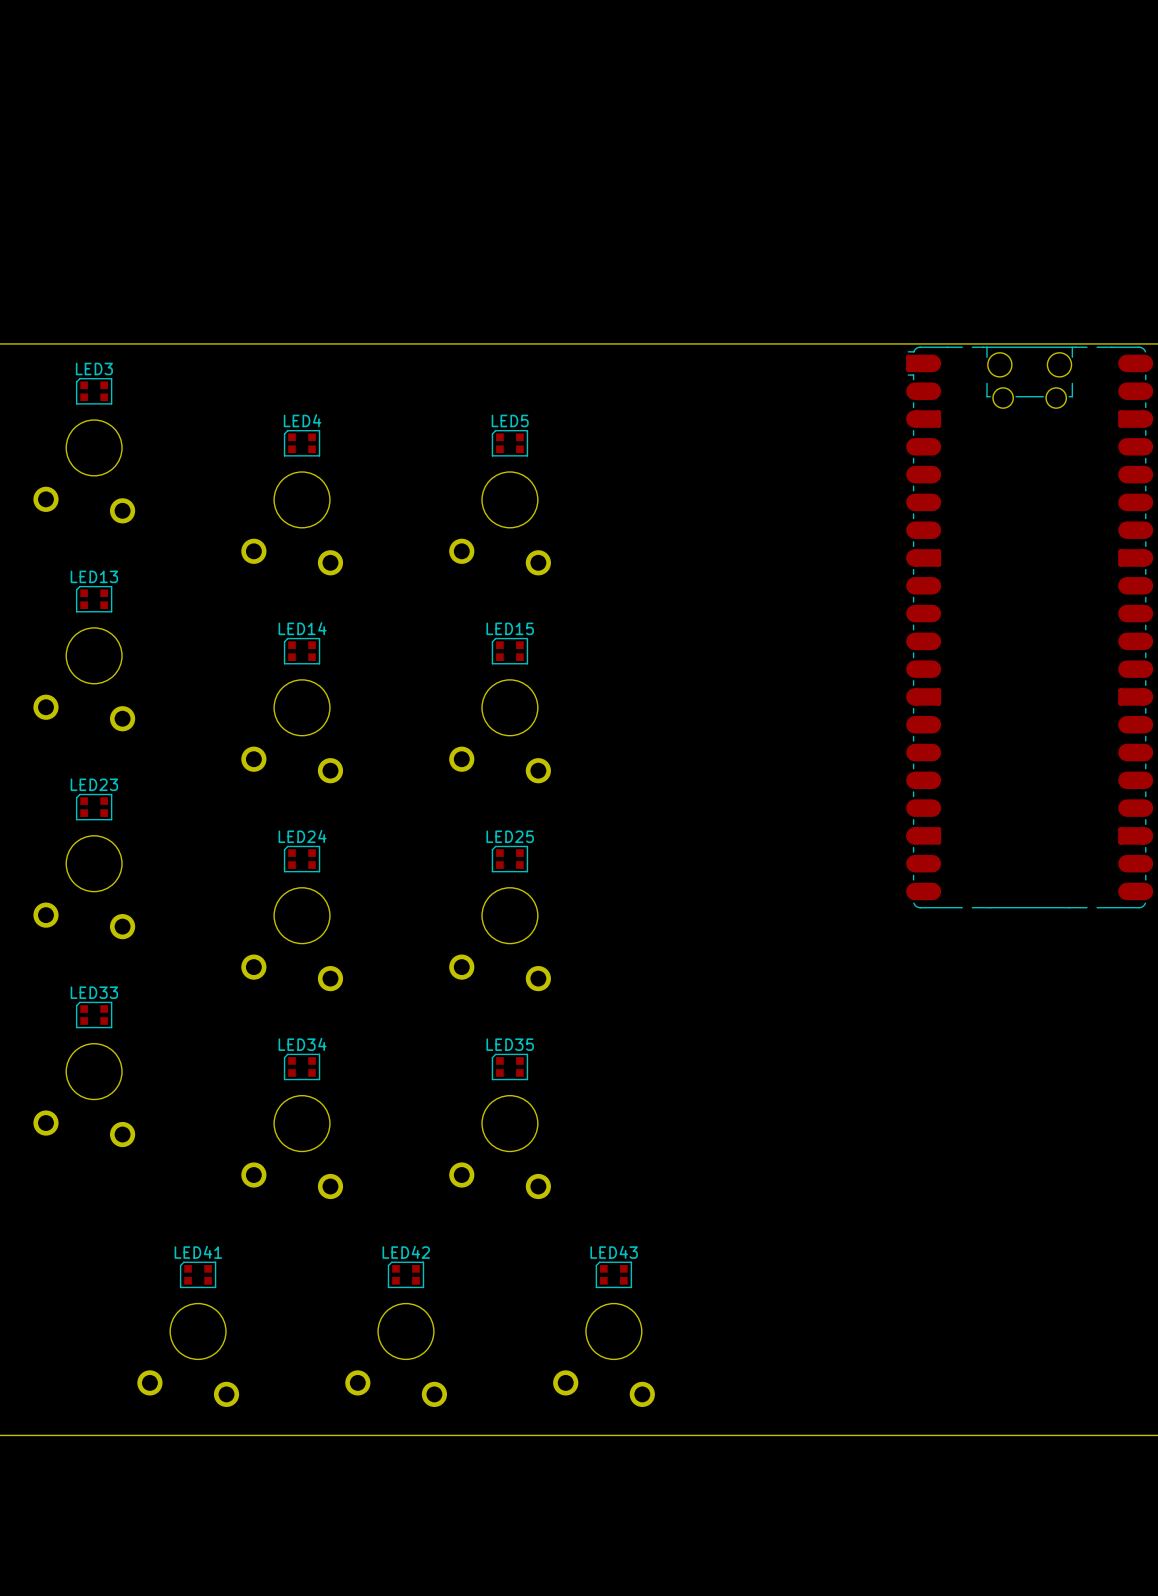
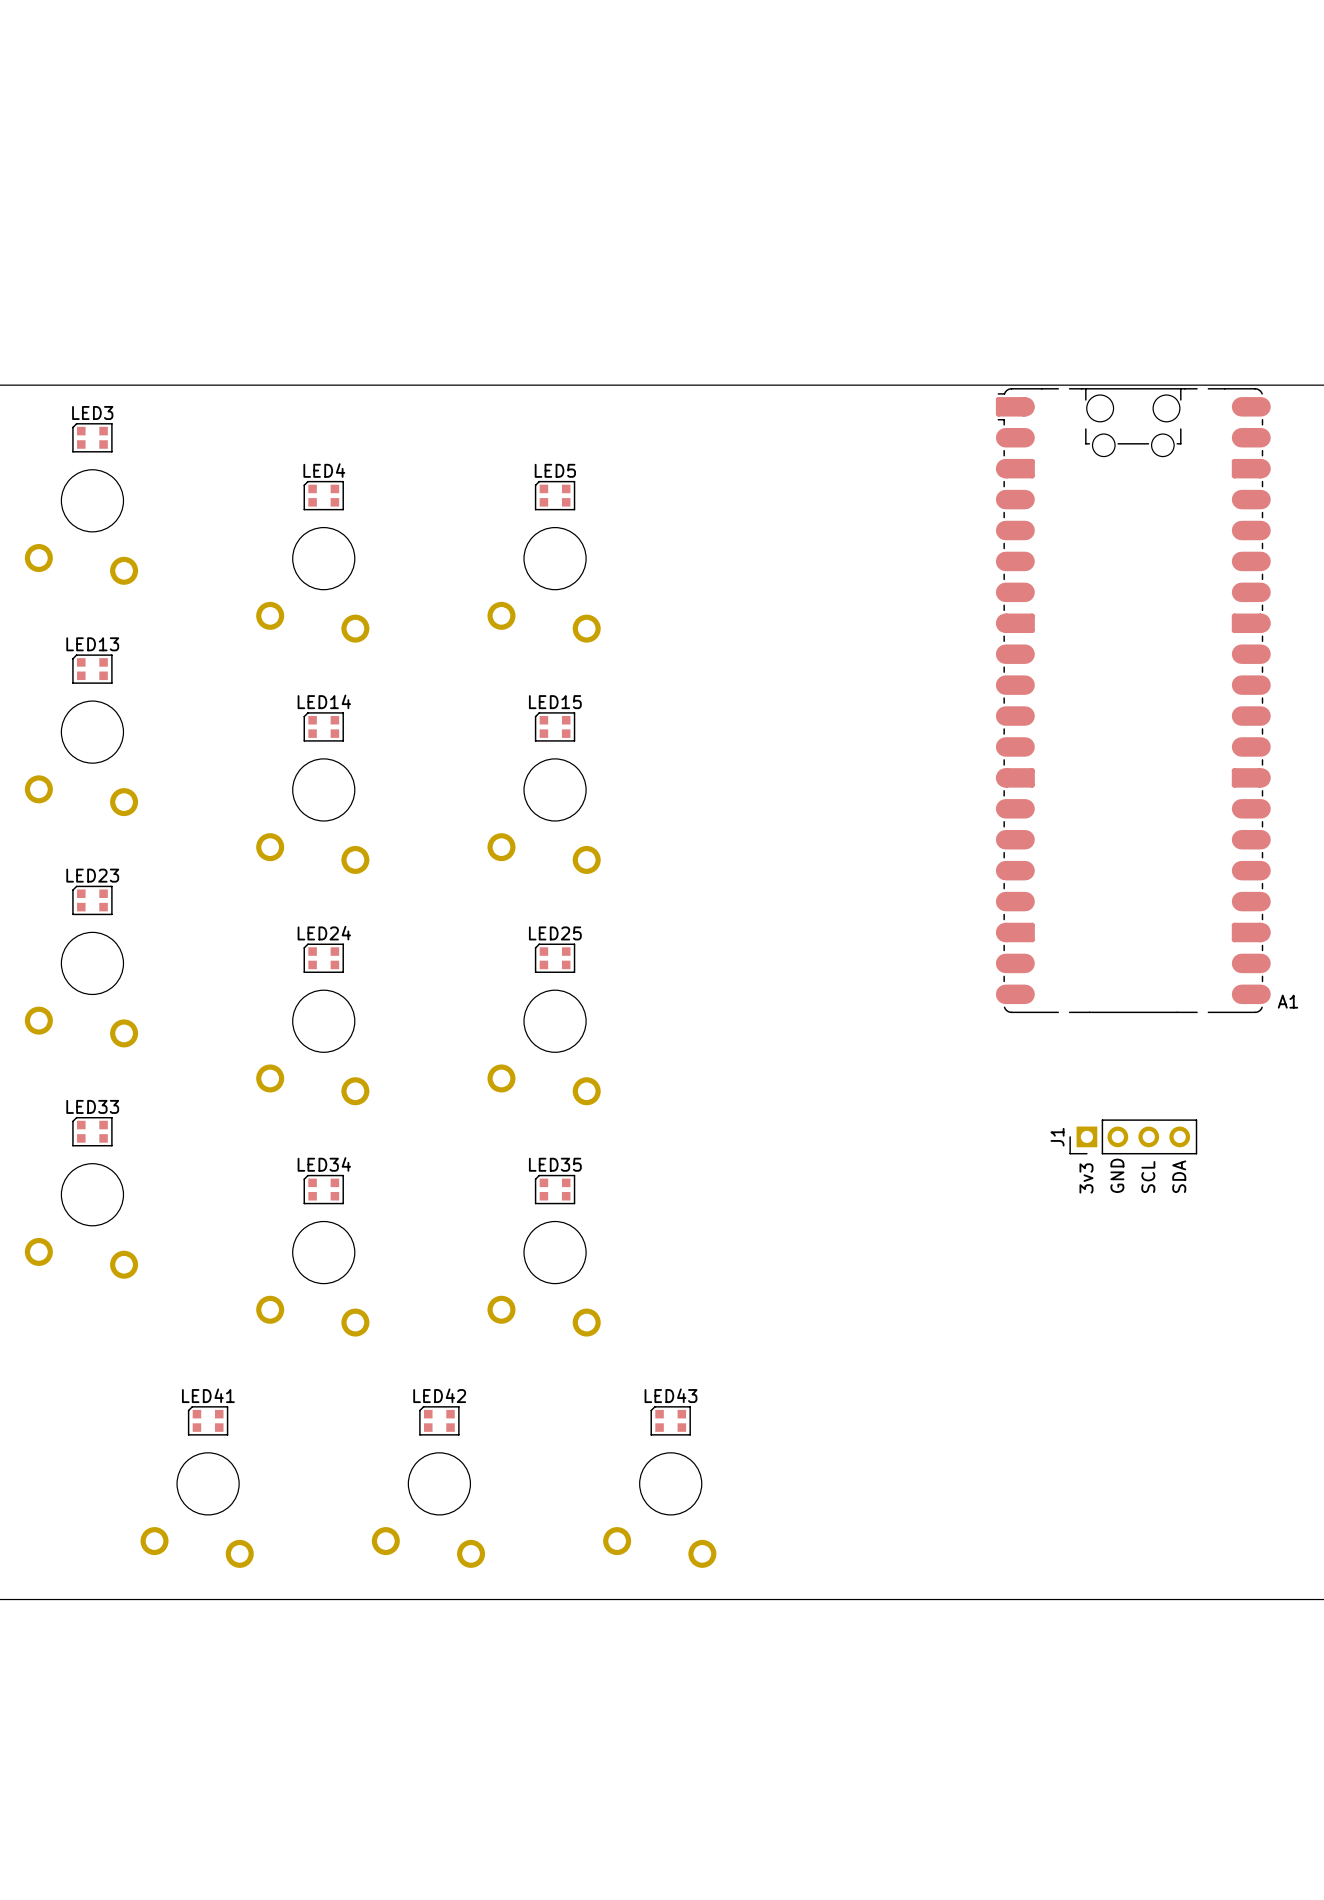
J1: none -> (1133, 1136)
text: none -> GND (1117, 1175)
text: none -> SCL (1148, 1176)
text: none -> SDA (1179, 1176)
text: none -> 3v3 (1086, 1178)

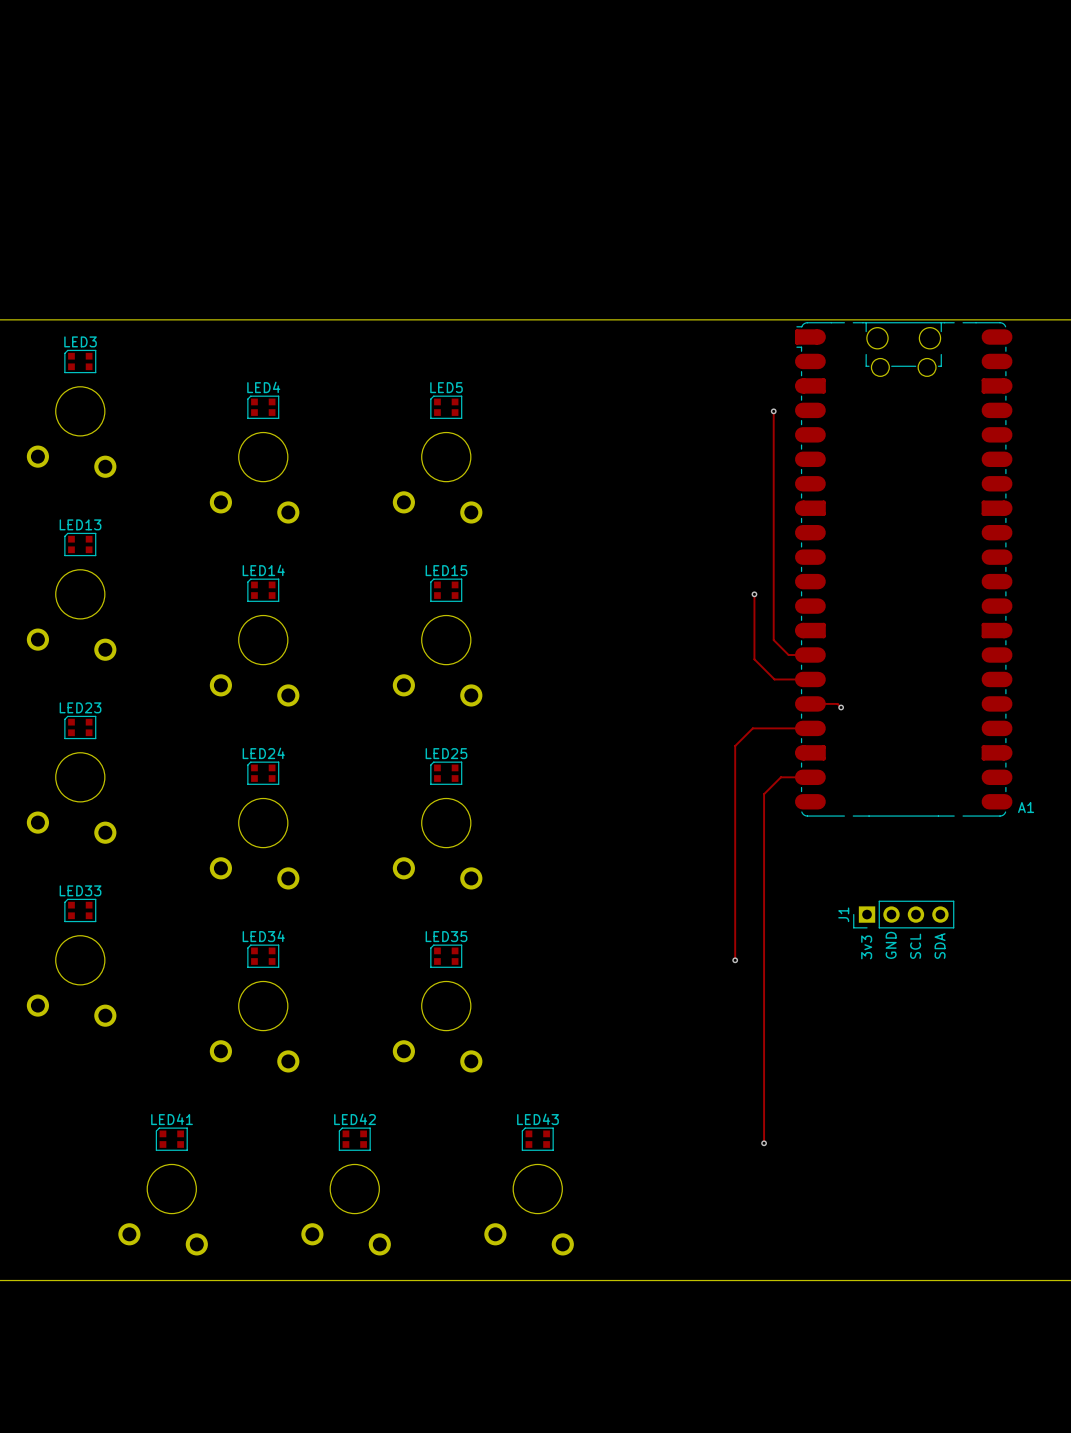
track: none -> (773, 411) (773, 640) (788, 655) (810, 655)
via: none -> (773, 411)
track: none -> (754, 594) (754, 659) (774, 679) (810, 679)
via: none -> (754, 594)
track: none -> (810, 703) (837, 703) (841, 707)
via: none -> (841, 707)
track: none -> (810, 728) (752, 728) (735, 746) (735, 960)
track: none -> (810, 777) (780, 777) (764, 794) (764, 1143)
via: none -> (735, 960)
via: none -> (764, 1143)

